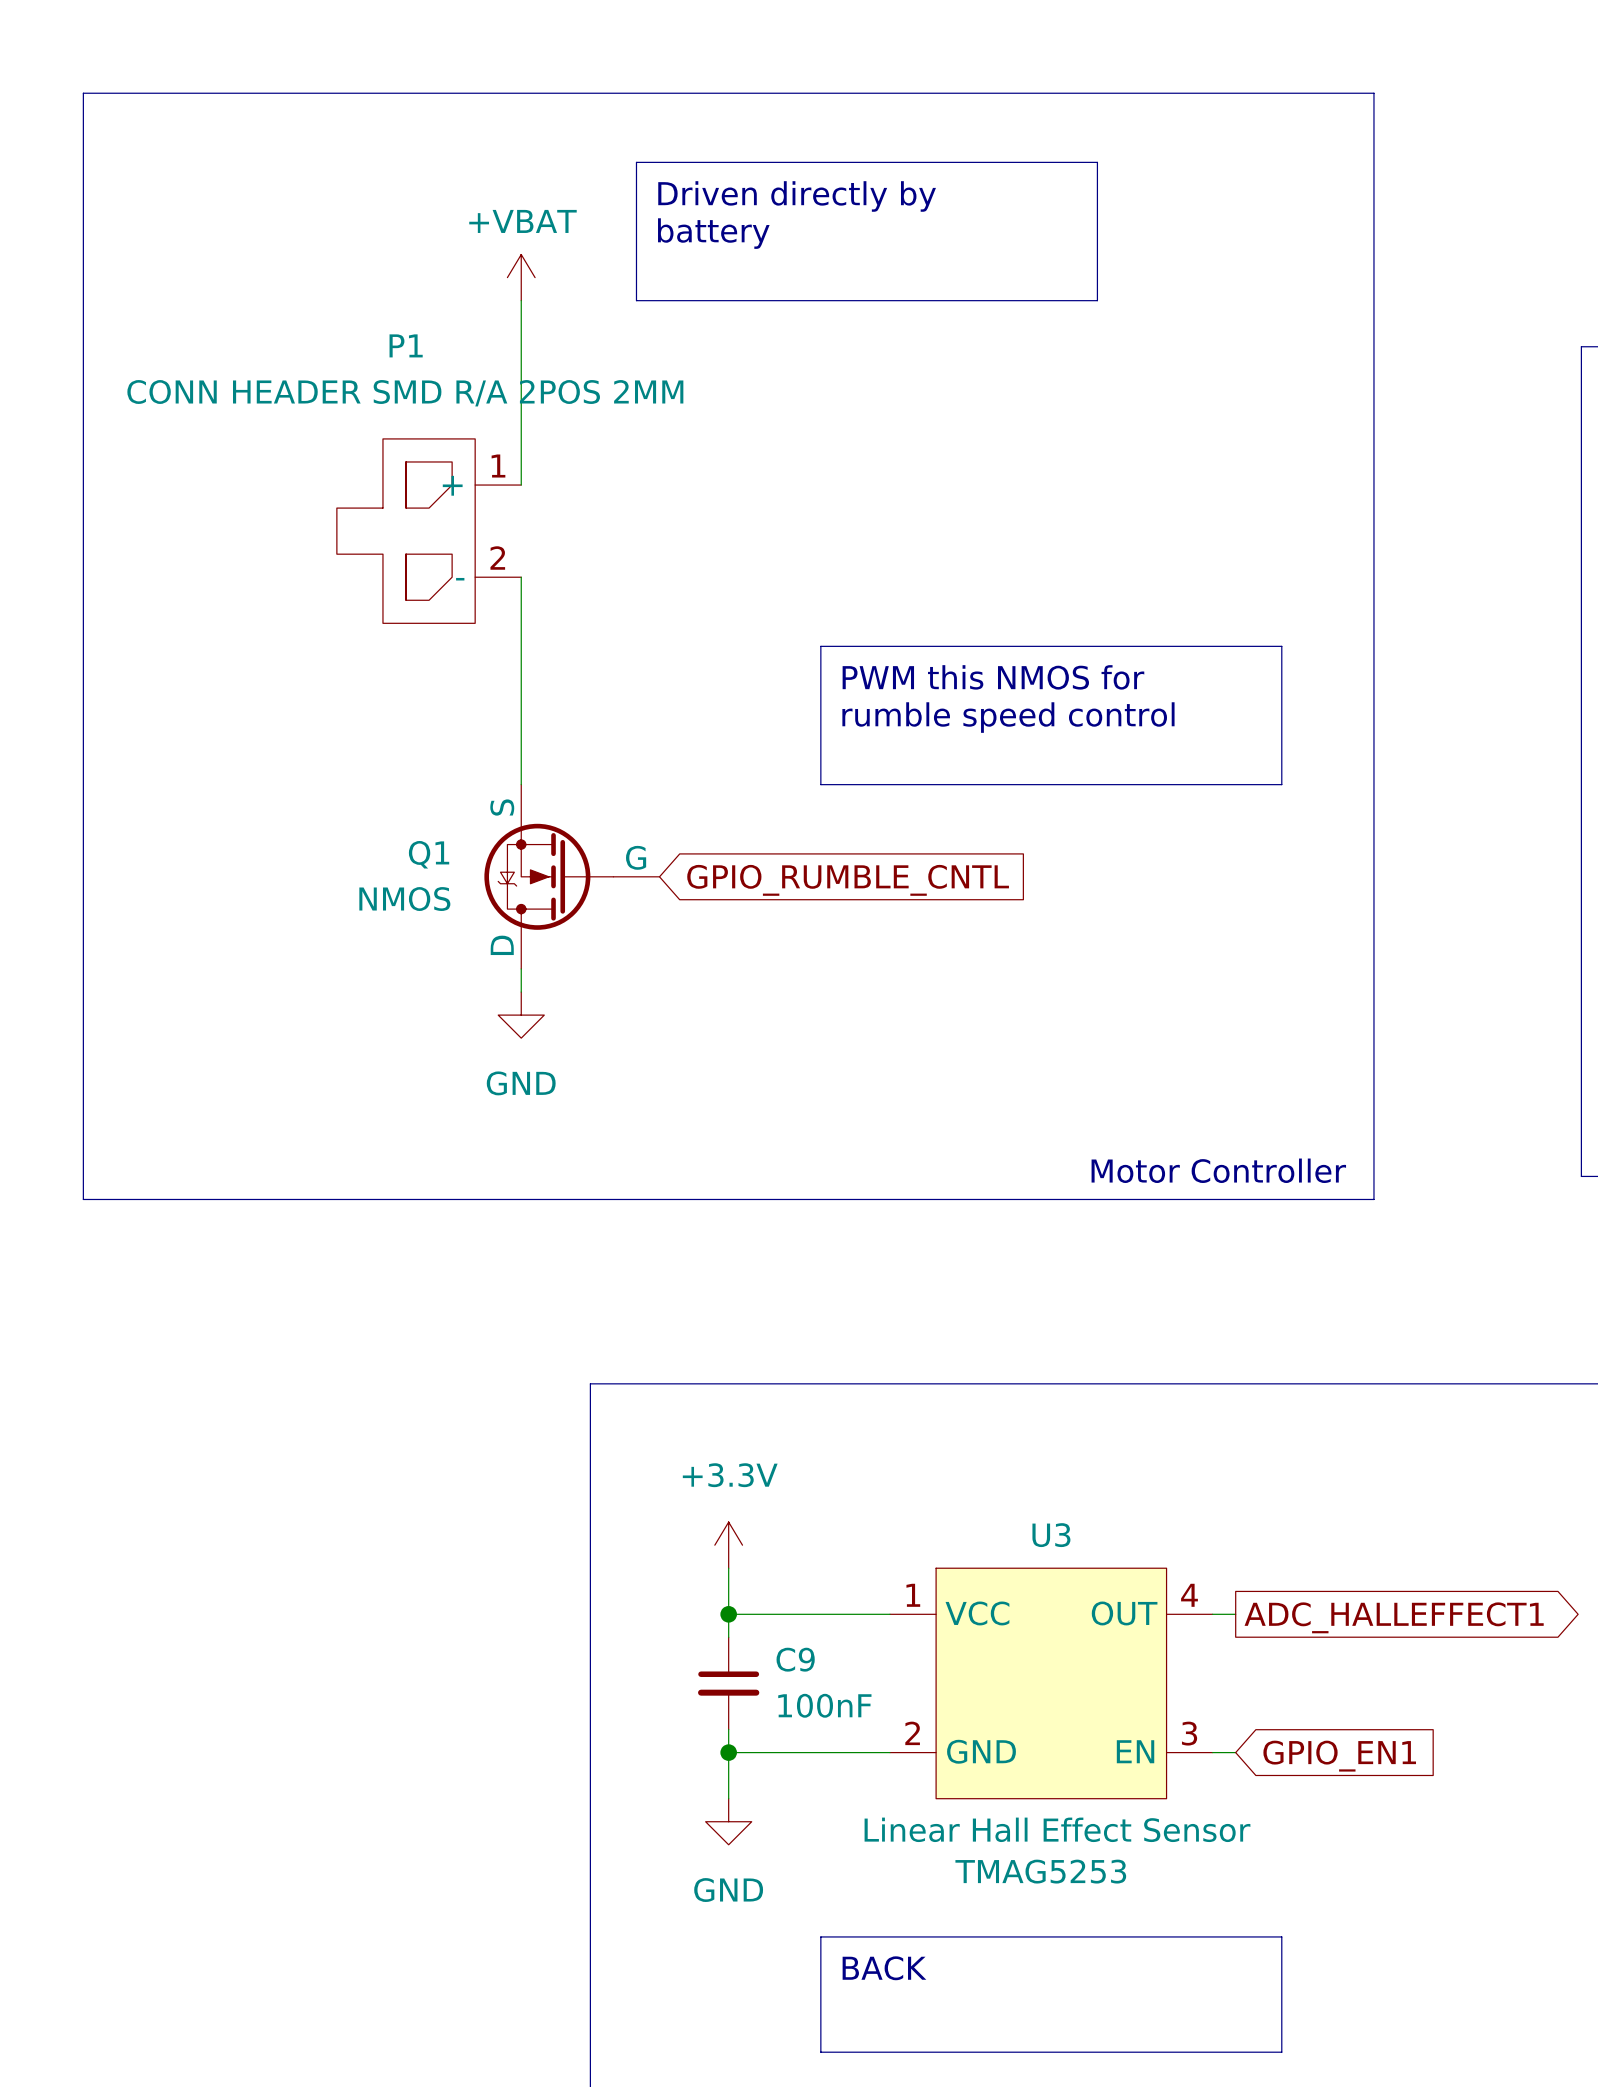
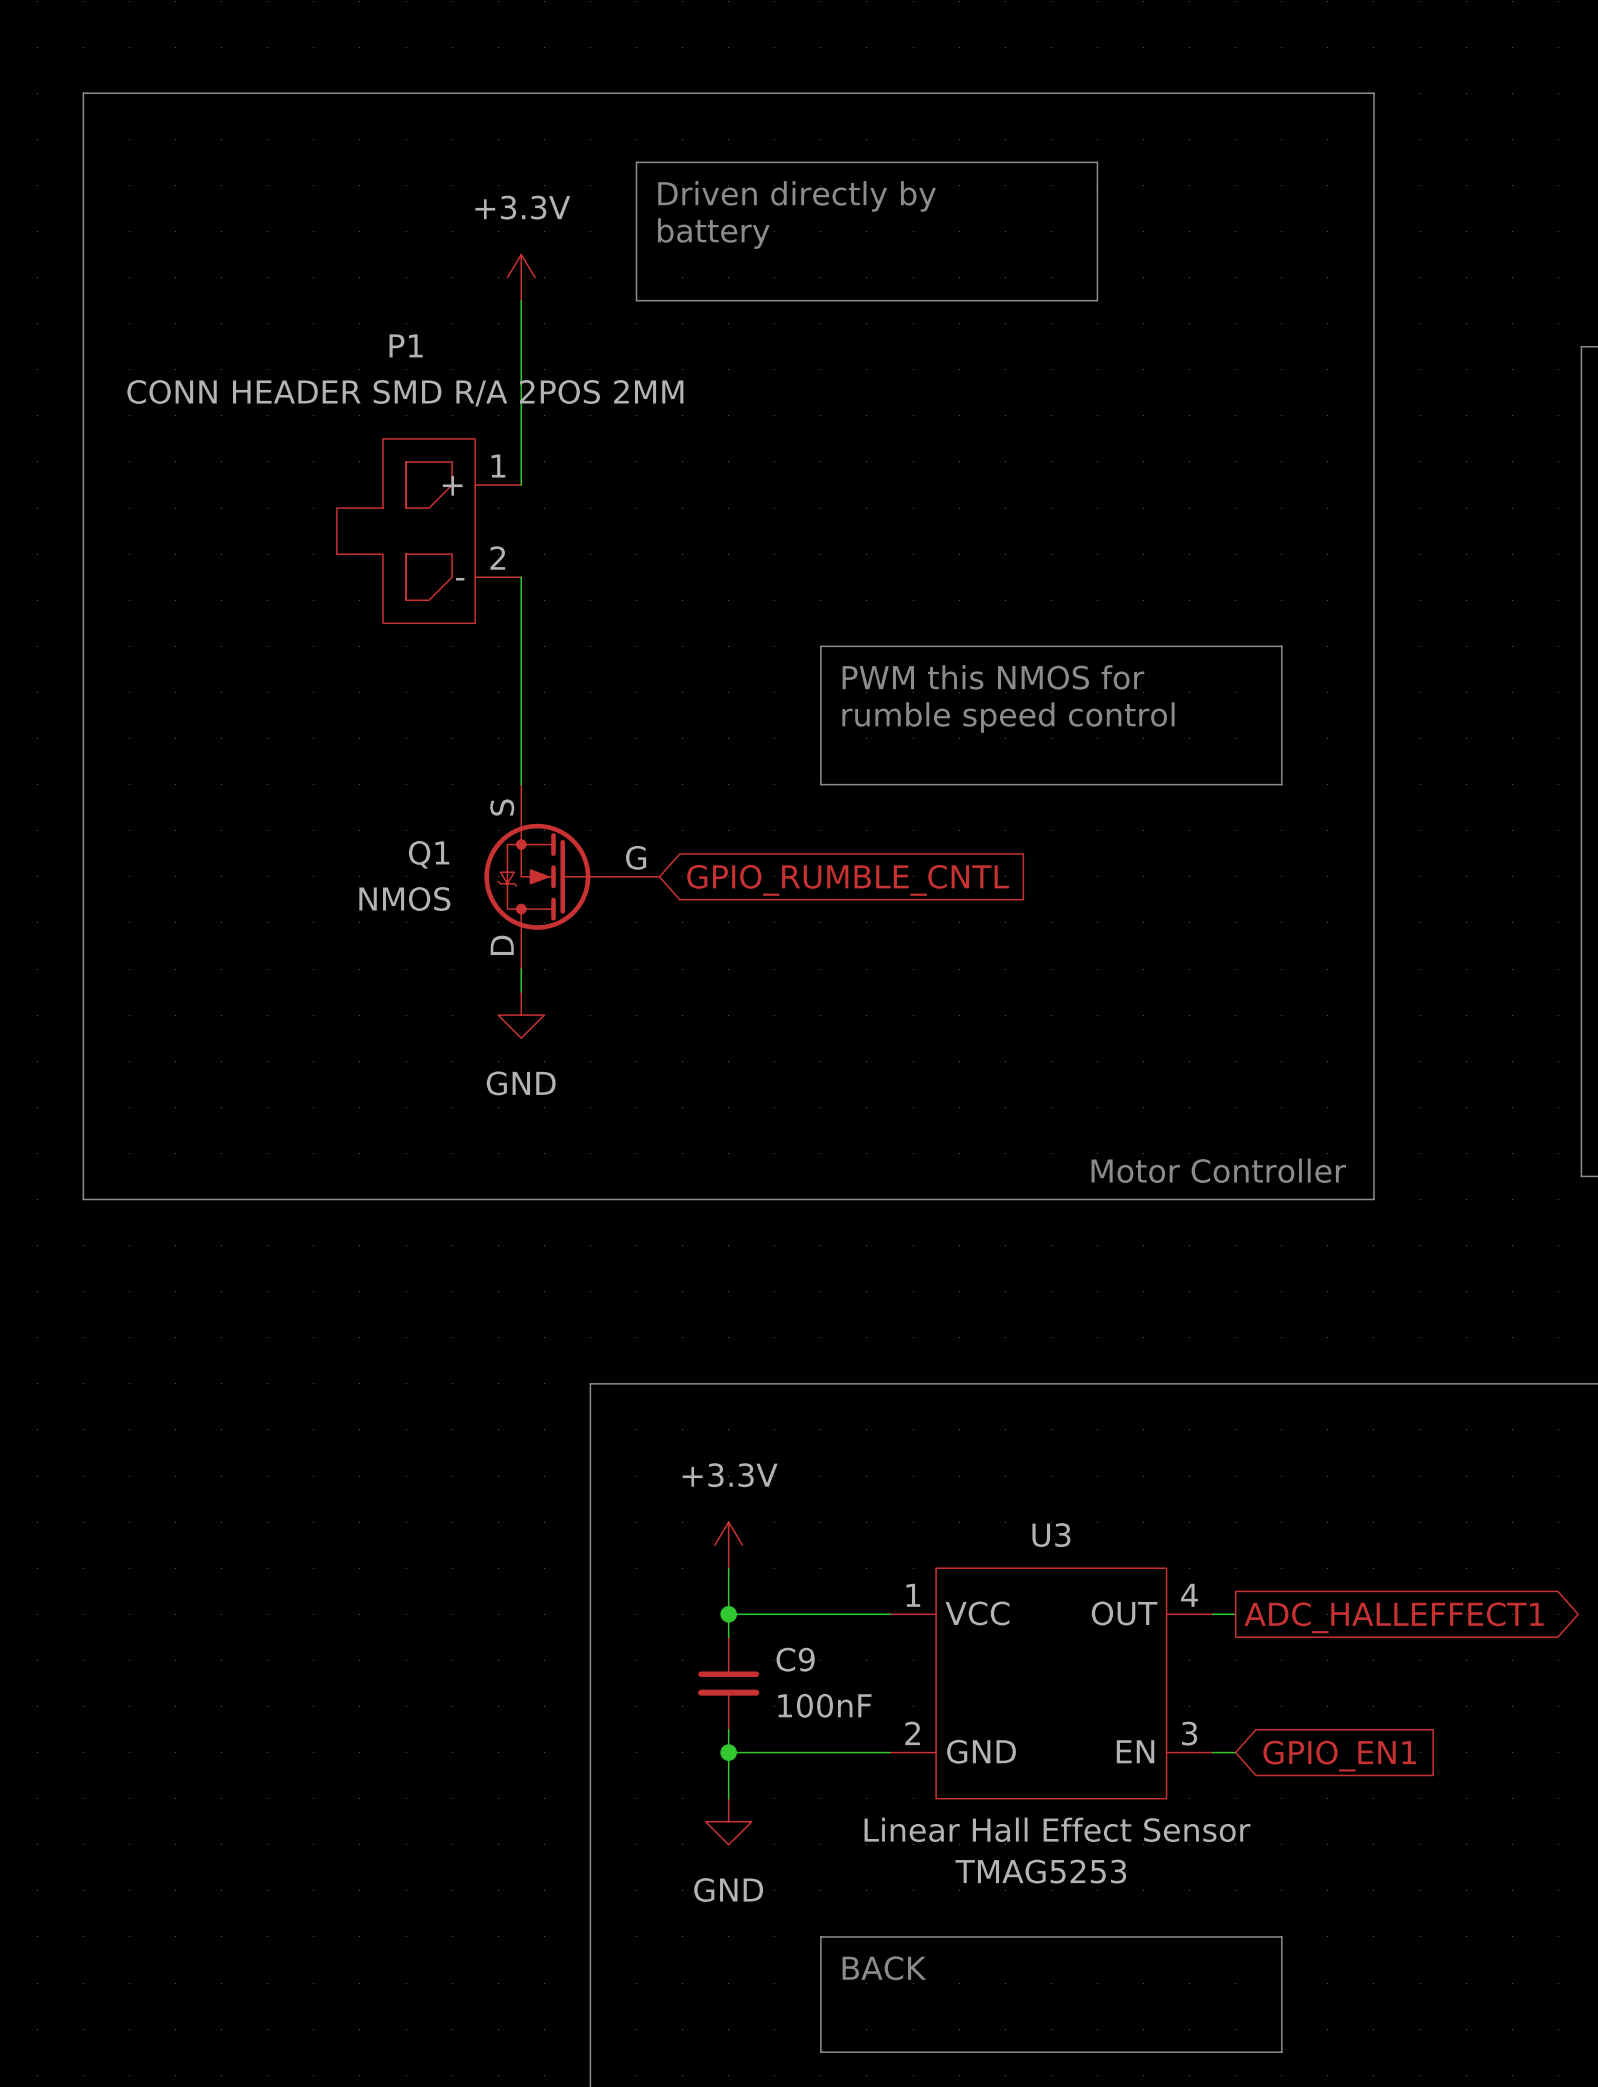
power symbol: +VBAT (521, 277) -> +3.3V (521, 277)

